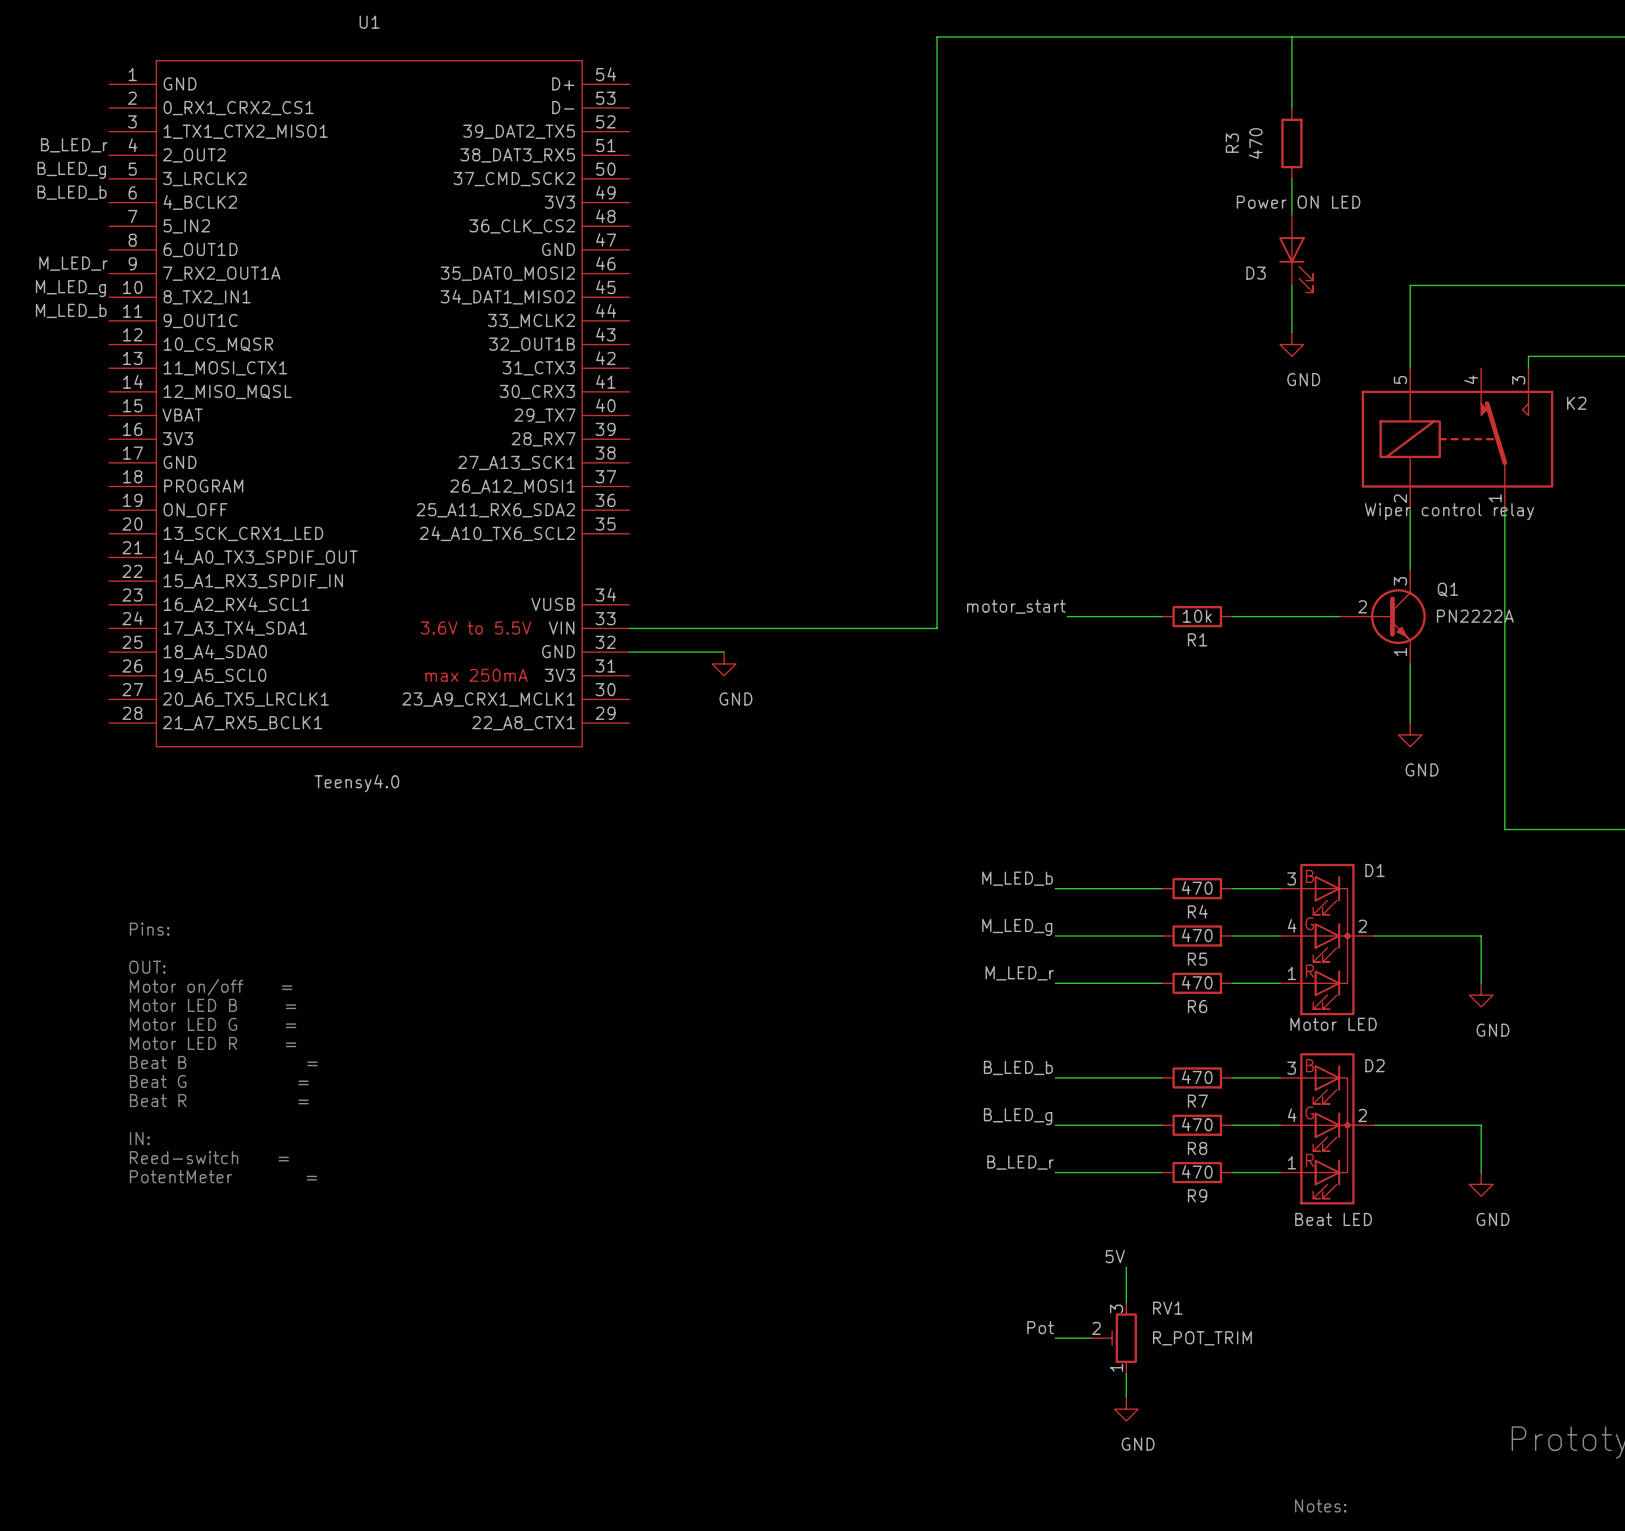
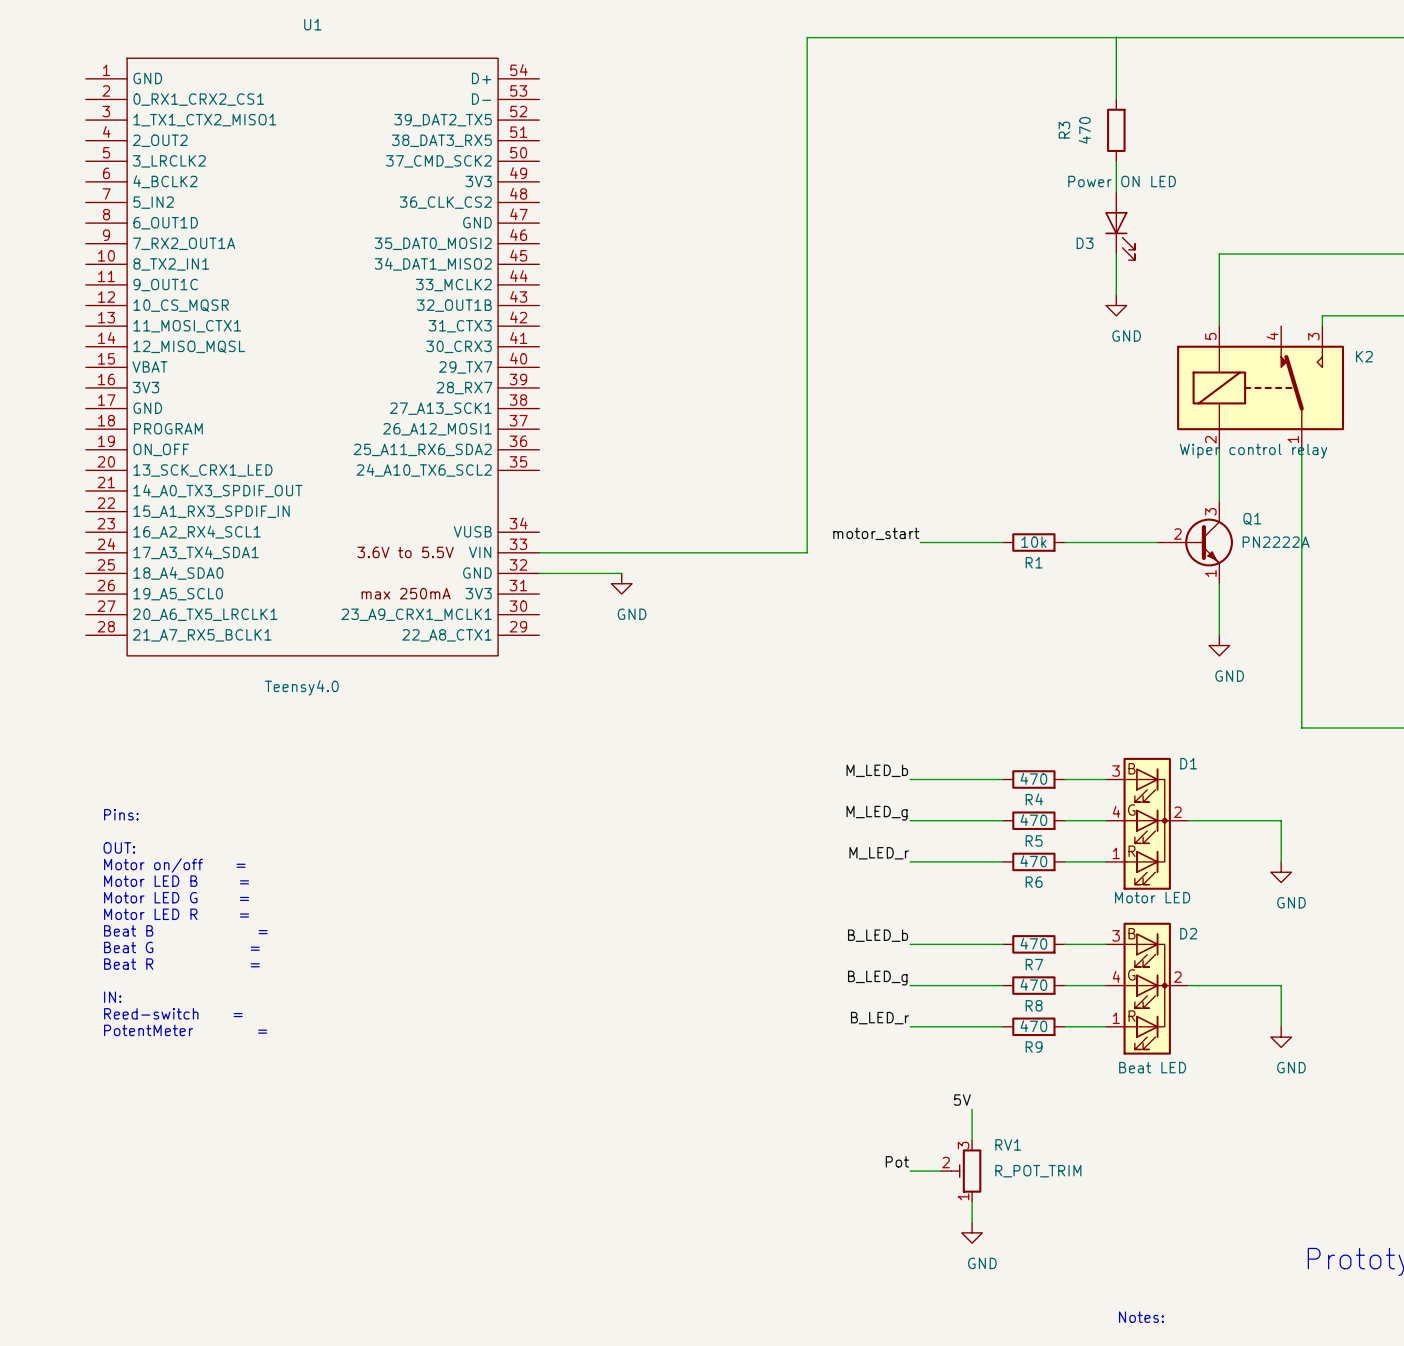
label: B_LED_r (74, 145) -> none
label: B_LED_g (71, 170) -> none
label: B_LED_b (72, 192) -> none
label: M_LED_r (73, 263) -> none
label: M_LED_g (70, 288) -> none
label: M_LED_b (71, 310) -> none

